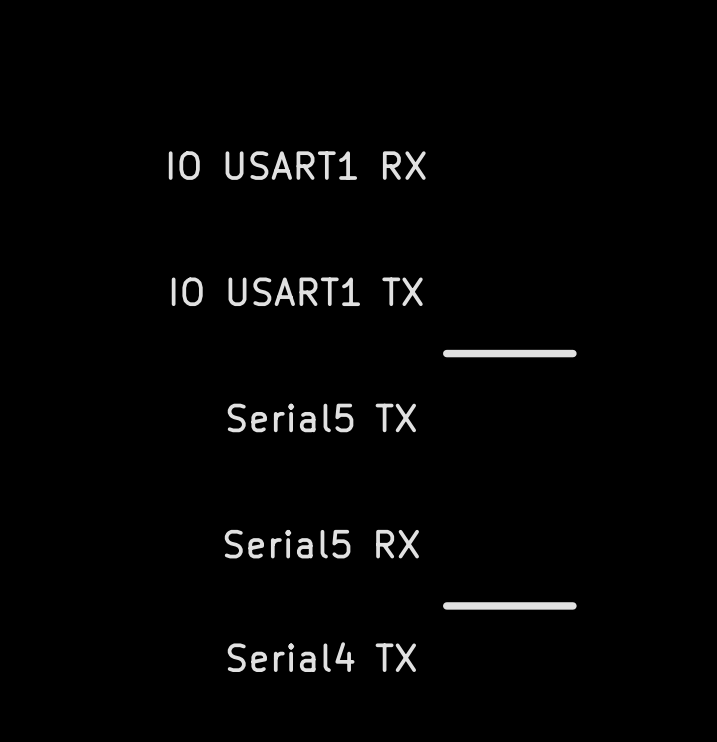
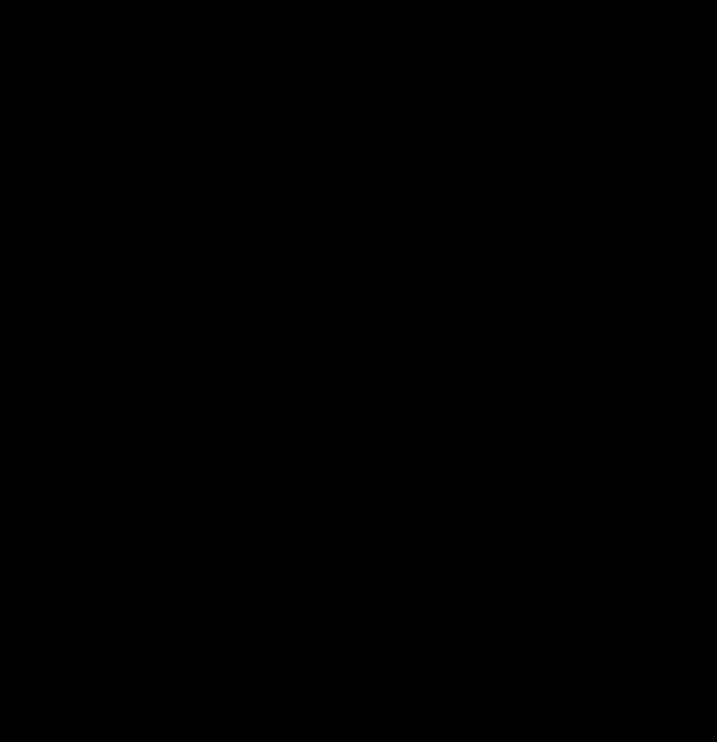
text: IO USART1 RX (297, 165) -> none
text: IO USART1 TX (297, 291) -> none
line: (446, 353) (572, 353) -> none
text: Serial5 TX (321, 417) -> none
text: Serial5 RX (321, 544) -> none
line: (446, 605) (572, 605) -> none
text: Serial4 TX (321, 657) -> none

